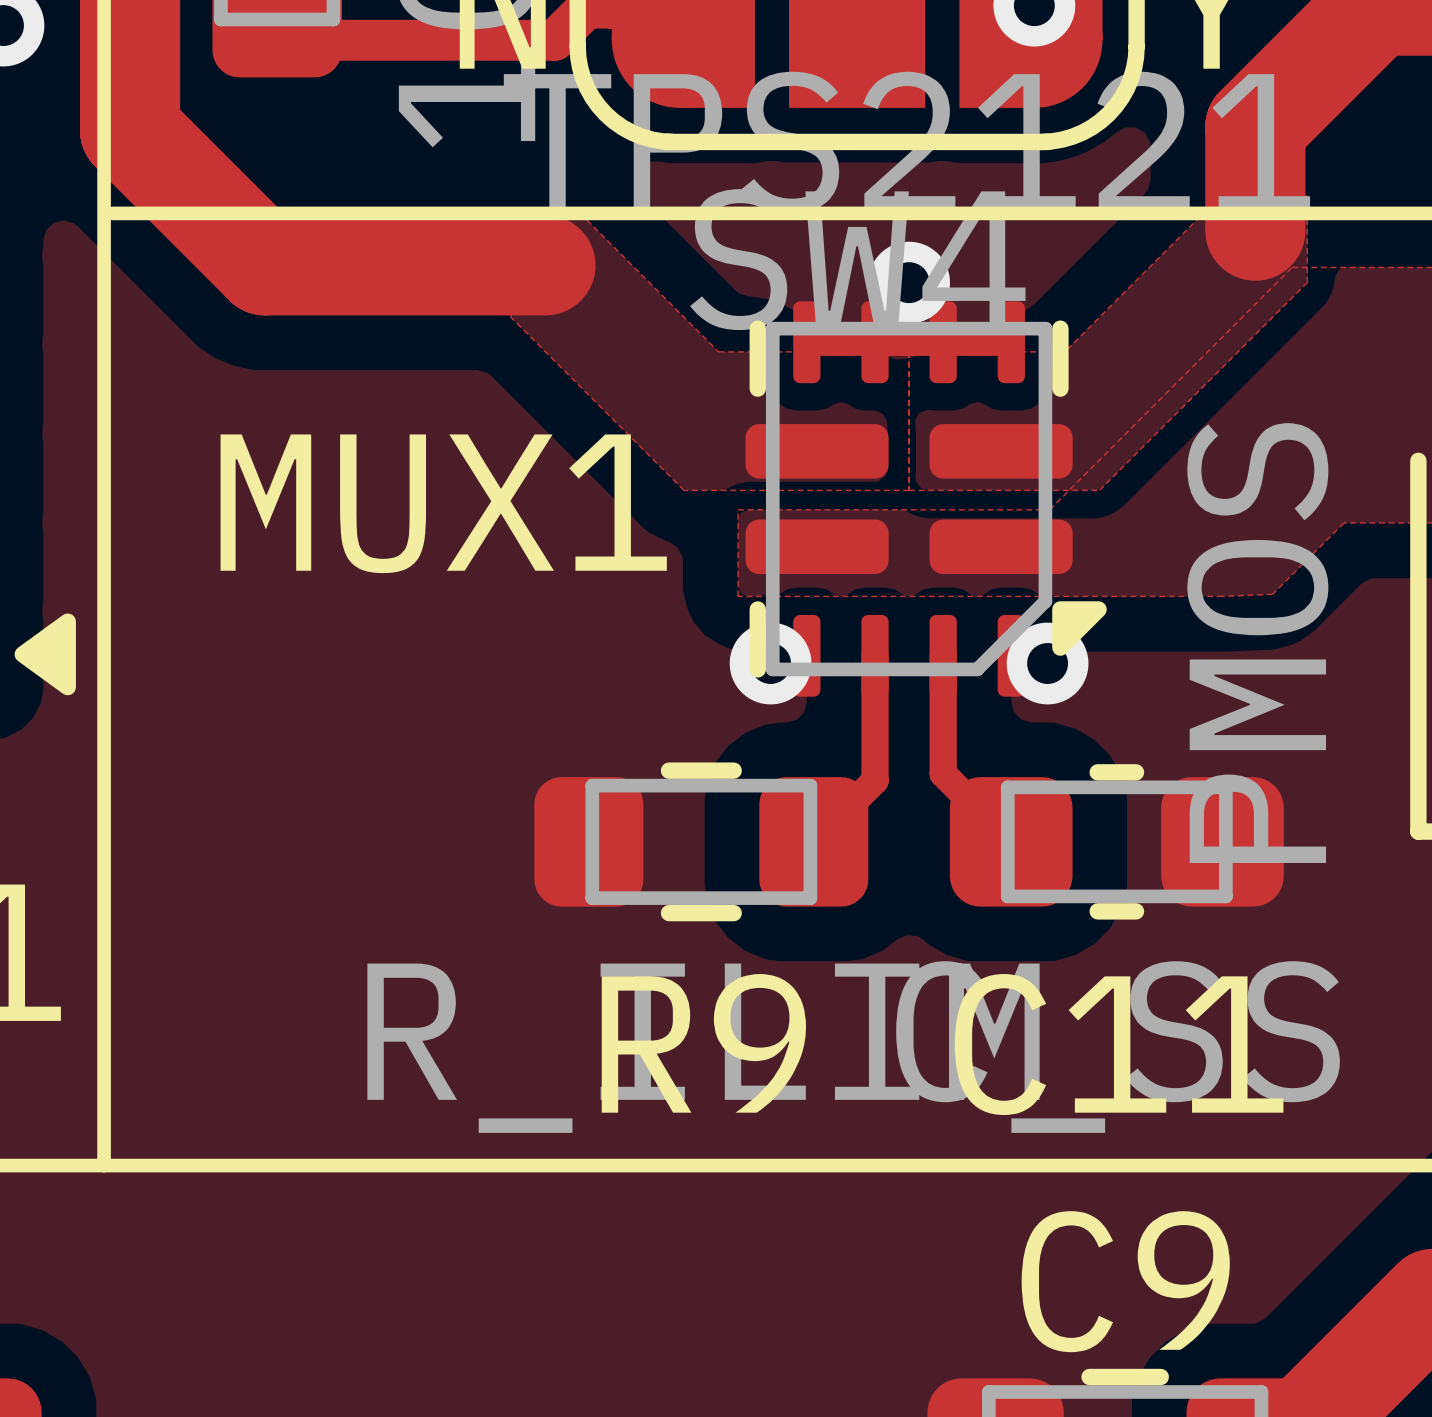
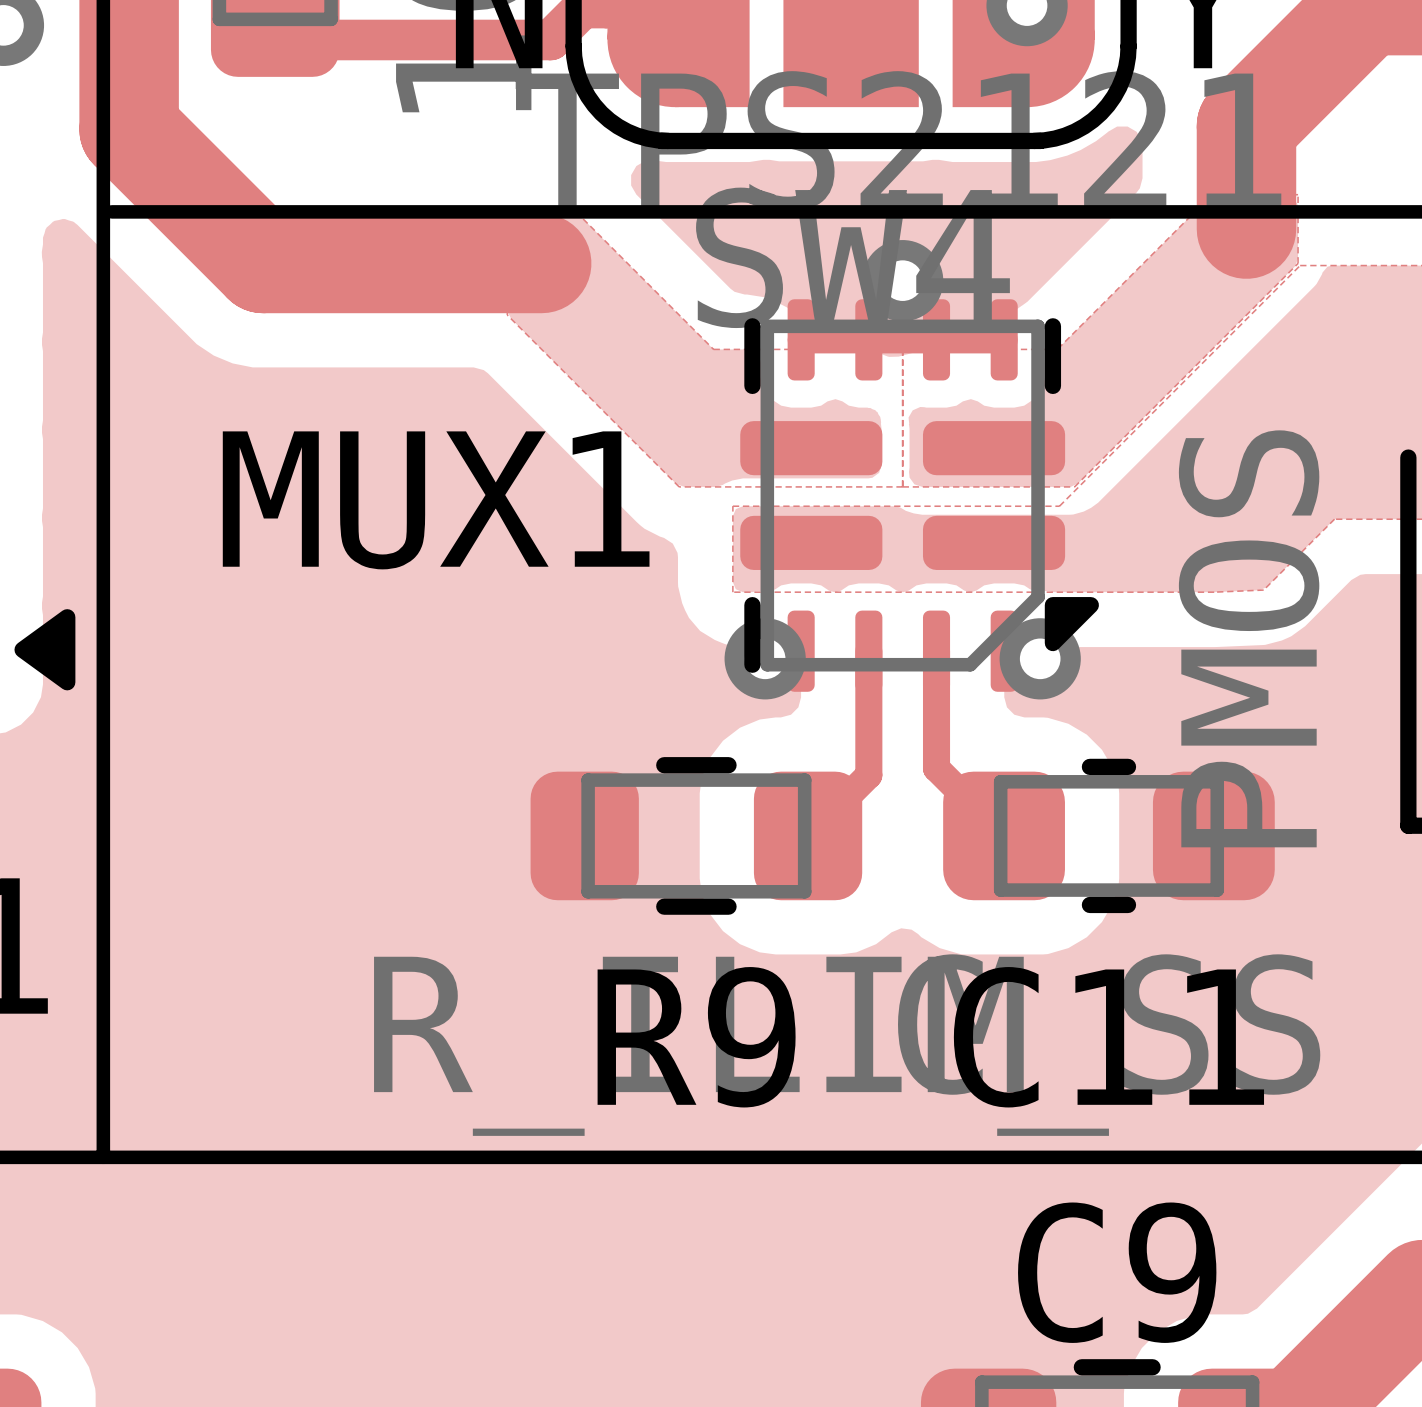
zone outline: (1307, 265) (1307, 282) (1099, 490) (1082, 490) -> (1298, 263) (1074, 486)
zone outline: (1309, 267) (1292, 267) (1049, 509) -> (1300, 265) (1059, 506) (1042, 506)

